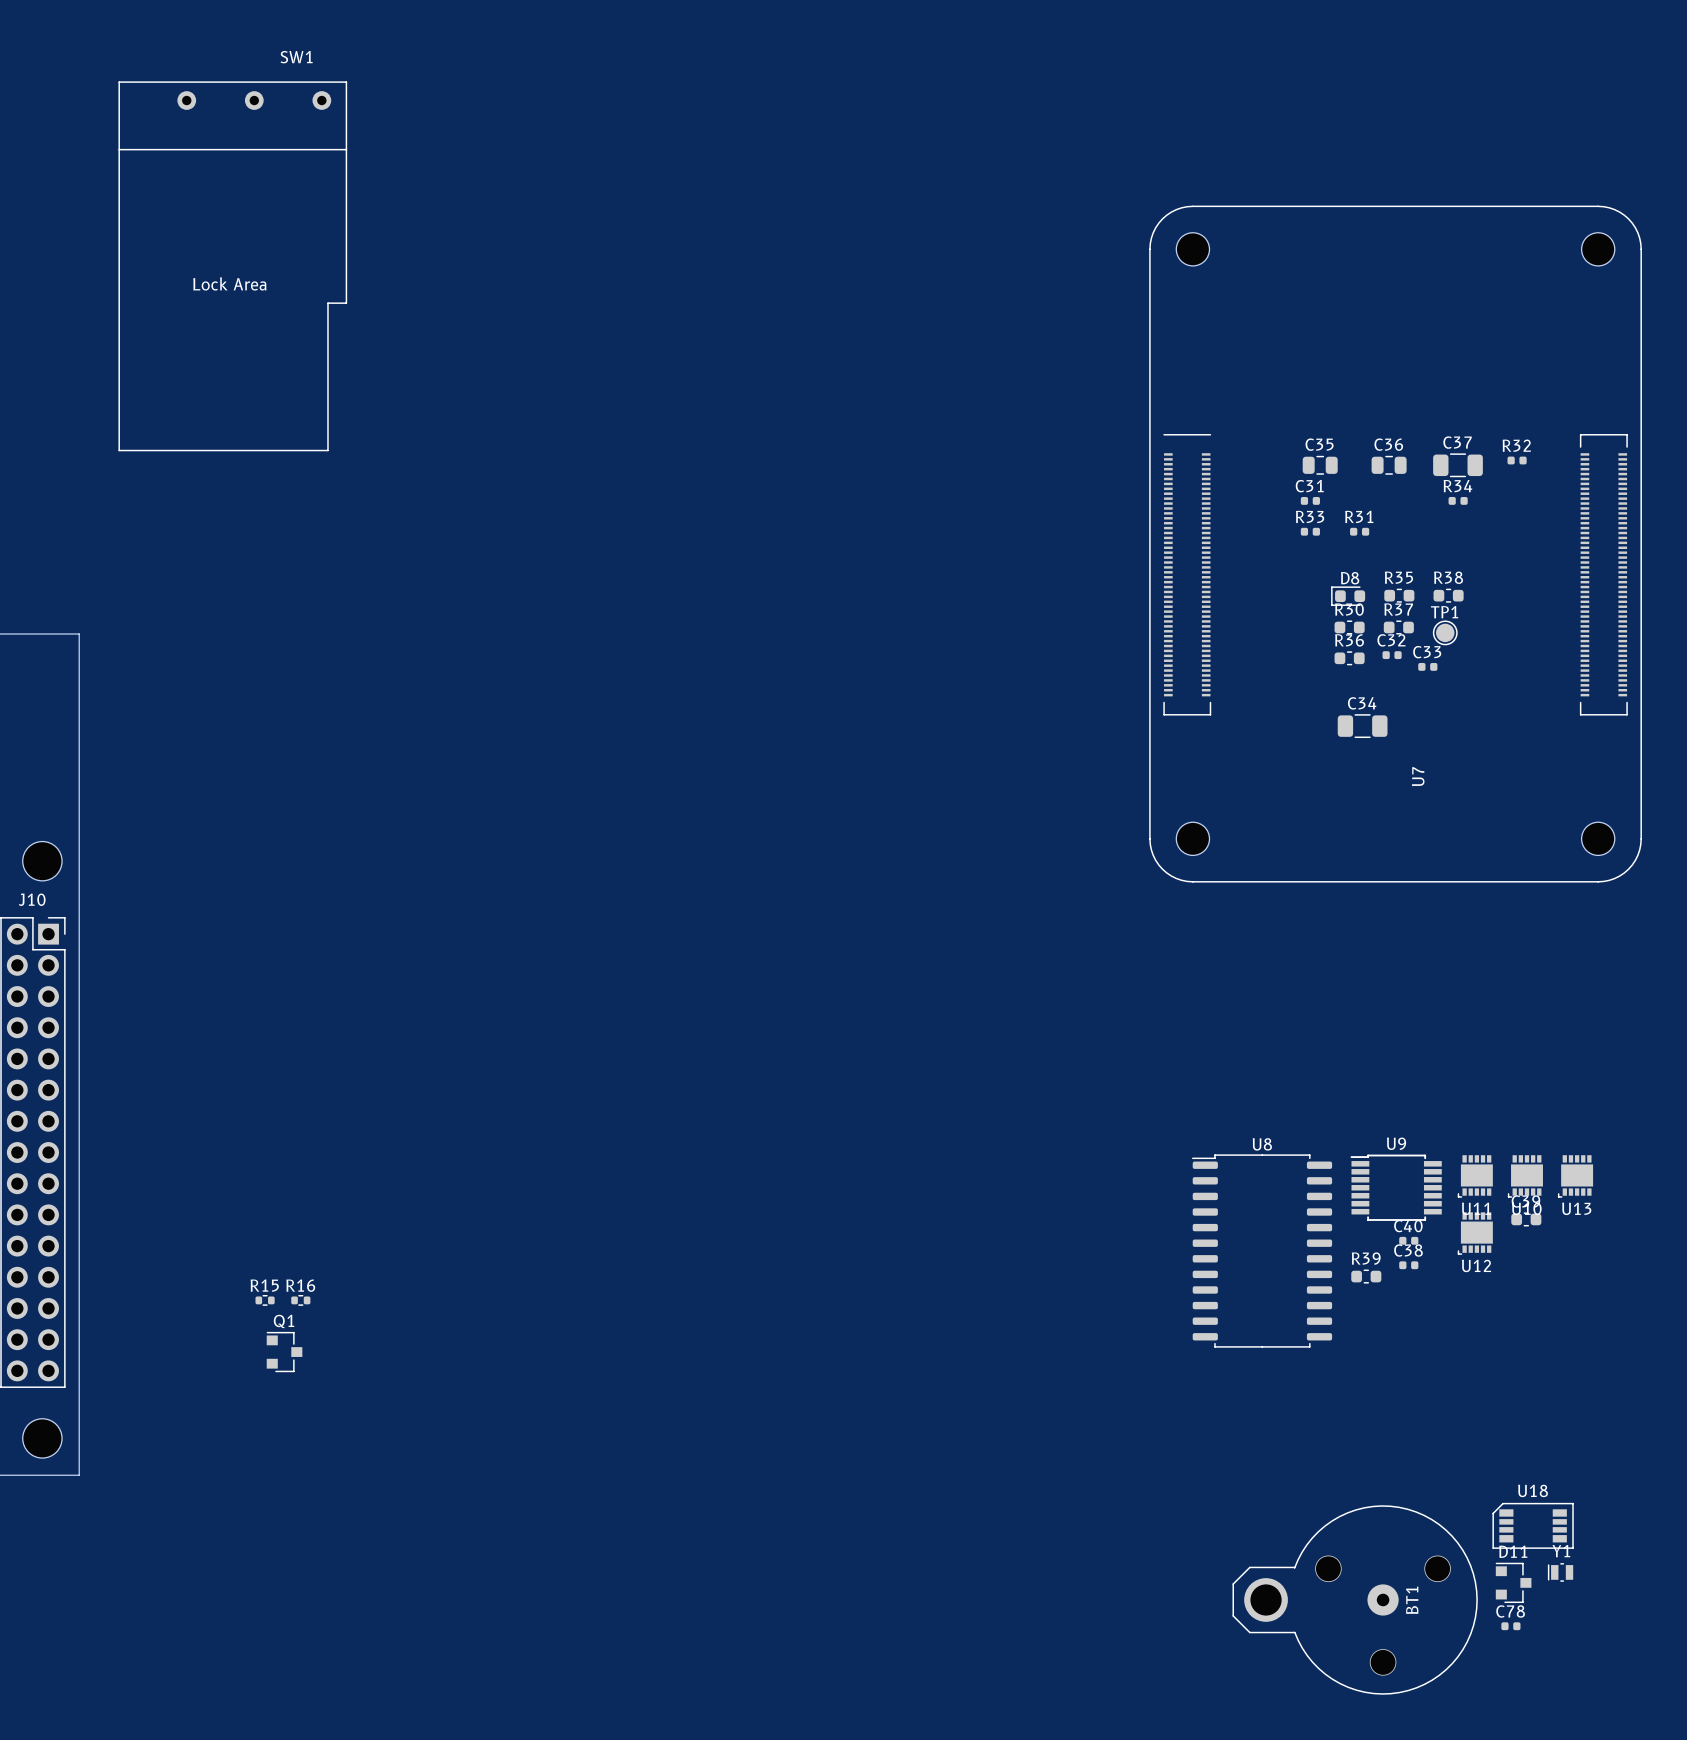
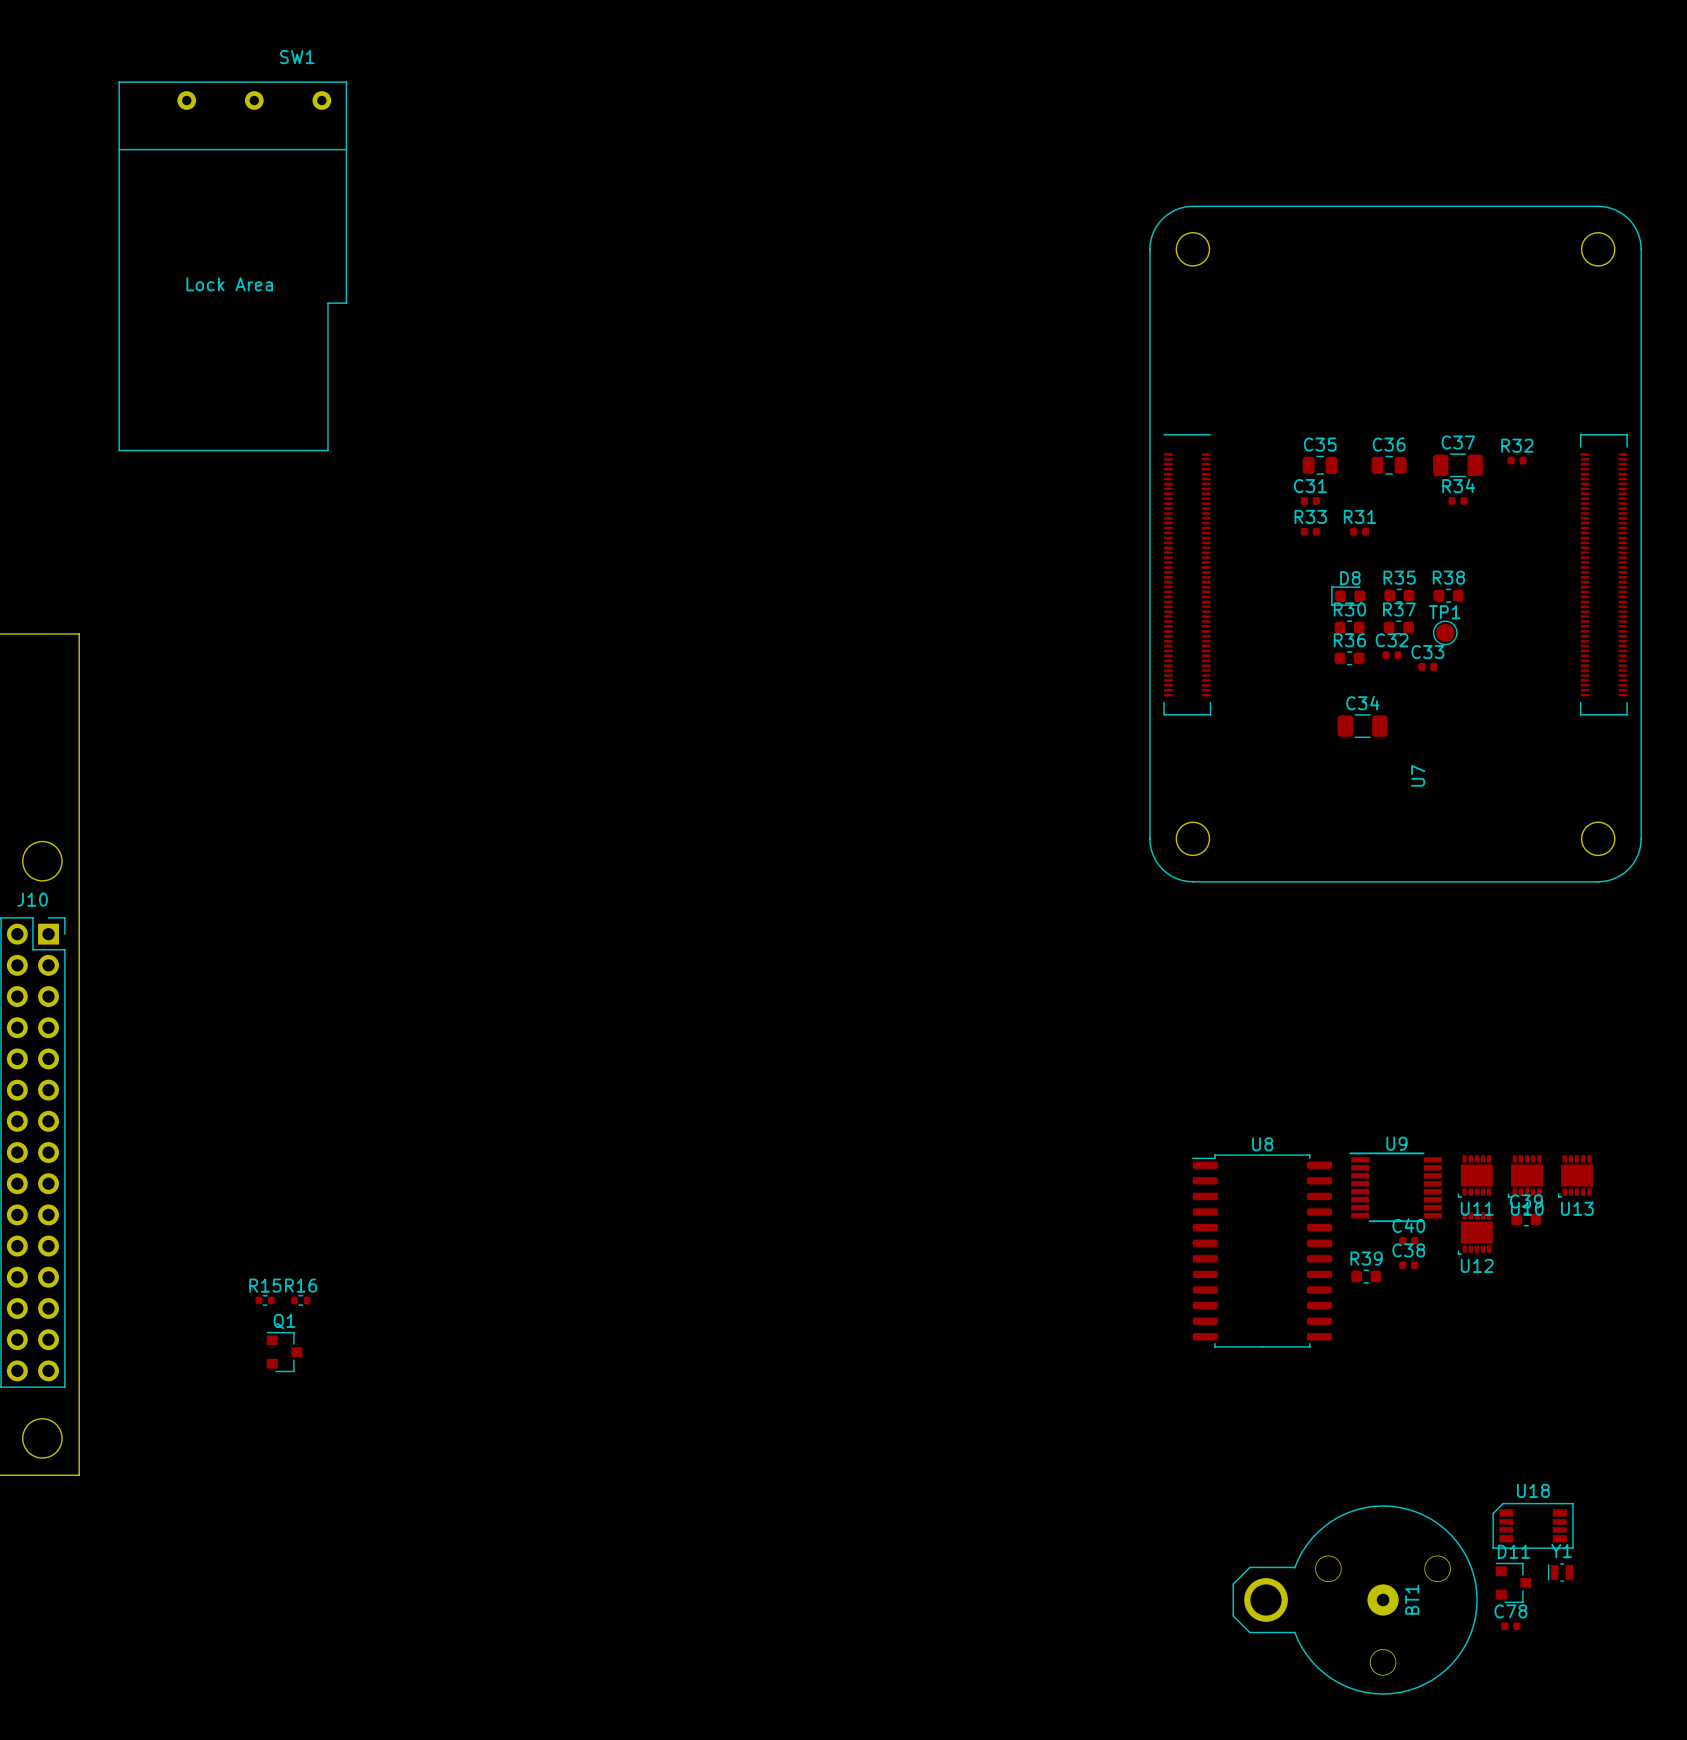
U9 footprint: [1350, 1154, 1442, 1221] -> [1349, 1152, 1443, 1223]

